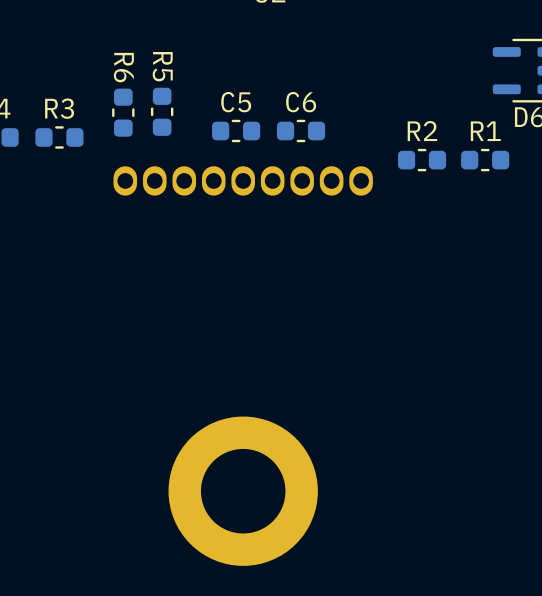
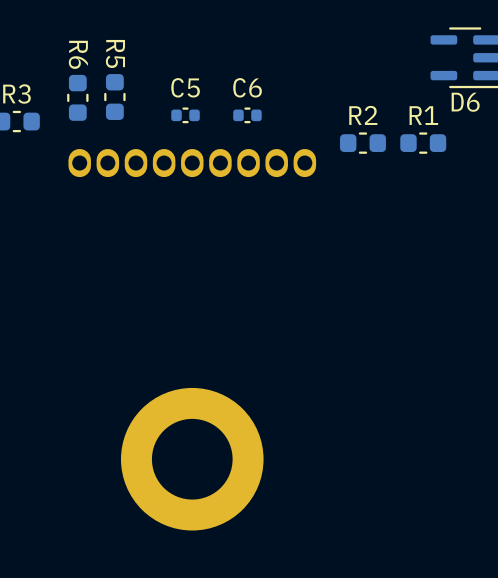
C5 footprint: [212, 119, 261, 143] -> [171, 107, 200, 124]
C6 footprint: [276, 119, 326, 143] -> [233, 107, 262, 124]

